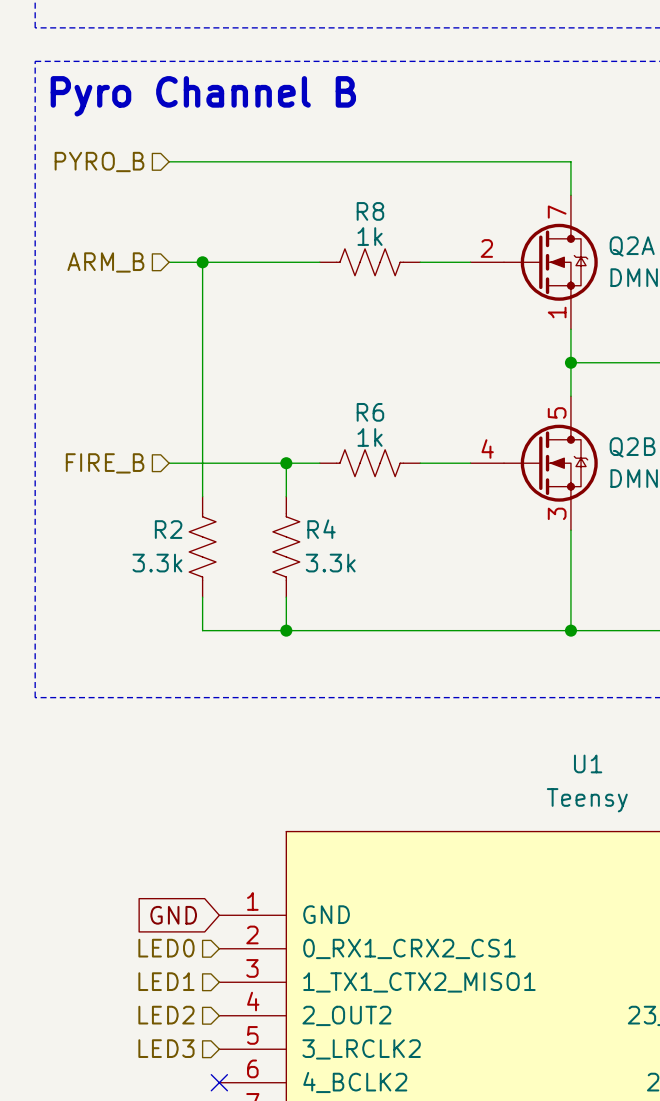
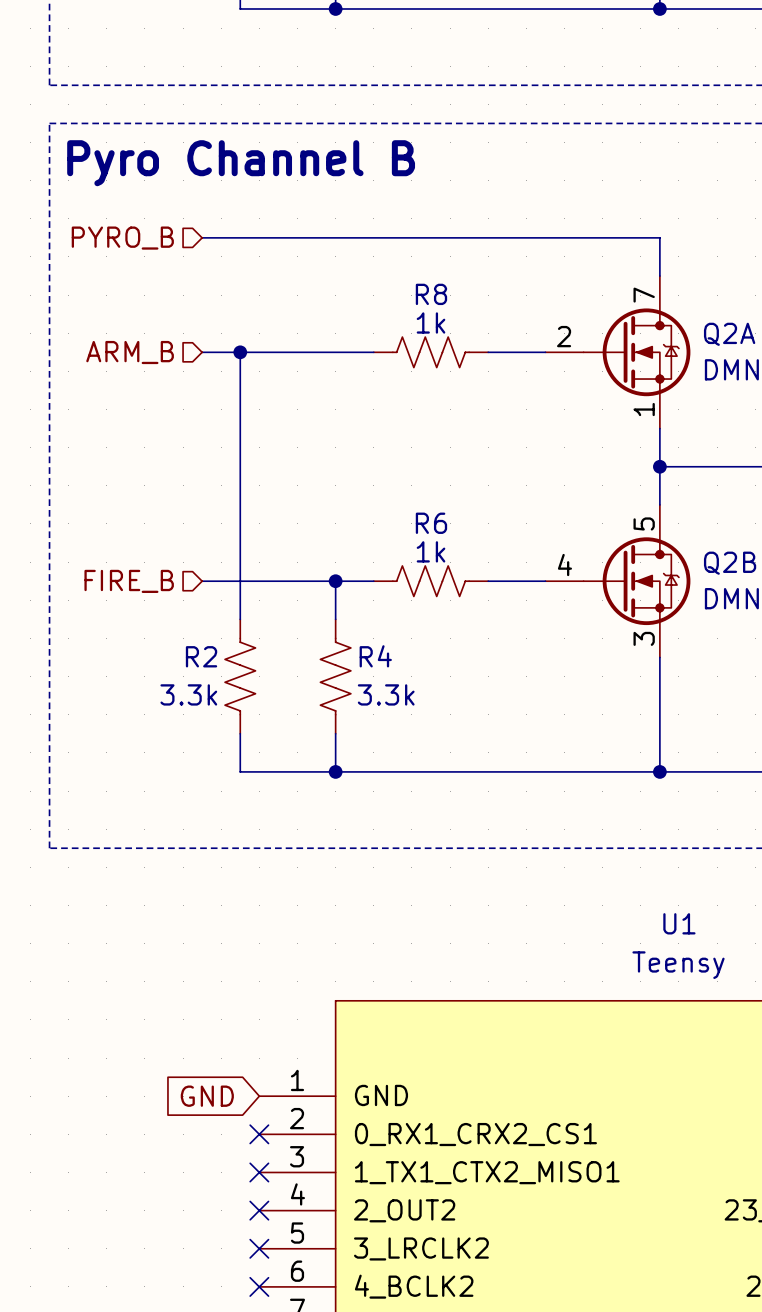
hierarchical label: LED0 (166, 948) -> none
no-connect mark: none -> (259, 1134)
hierarchical label: LED1 (166, 981) -> none
no-connect mark: none -> (259, 1172)
hierarchical label: LED2 (166, 1015) -> none
no-connect mark: none -> (259, 1210)
hierarchical label: LED3 (166, 1048) -> none
no-connect mark: none -> (259, 1248)

